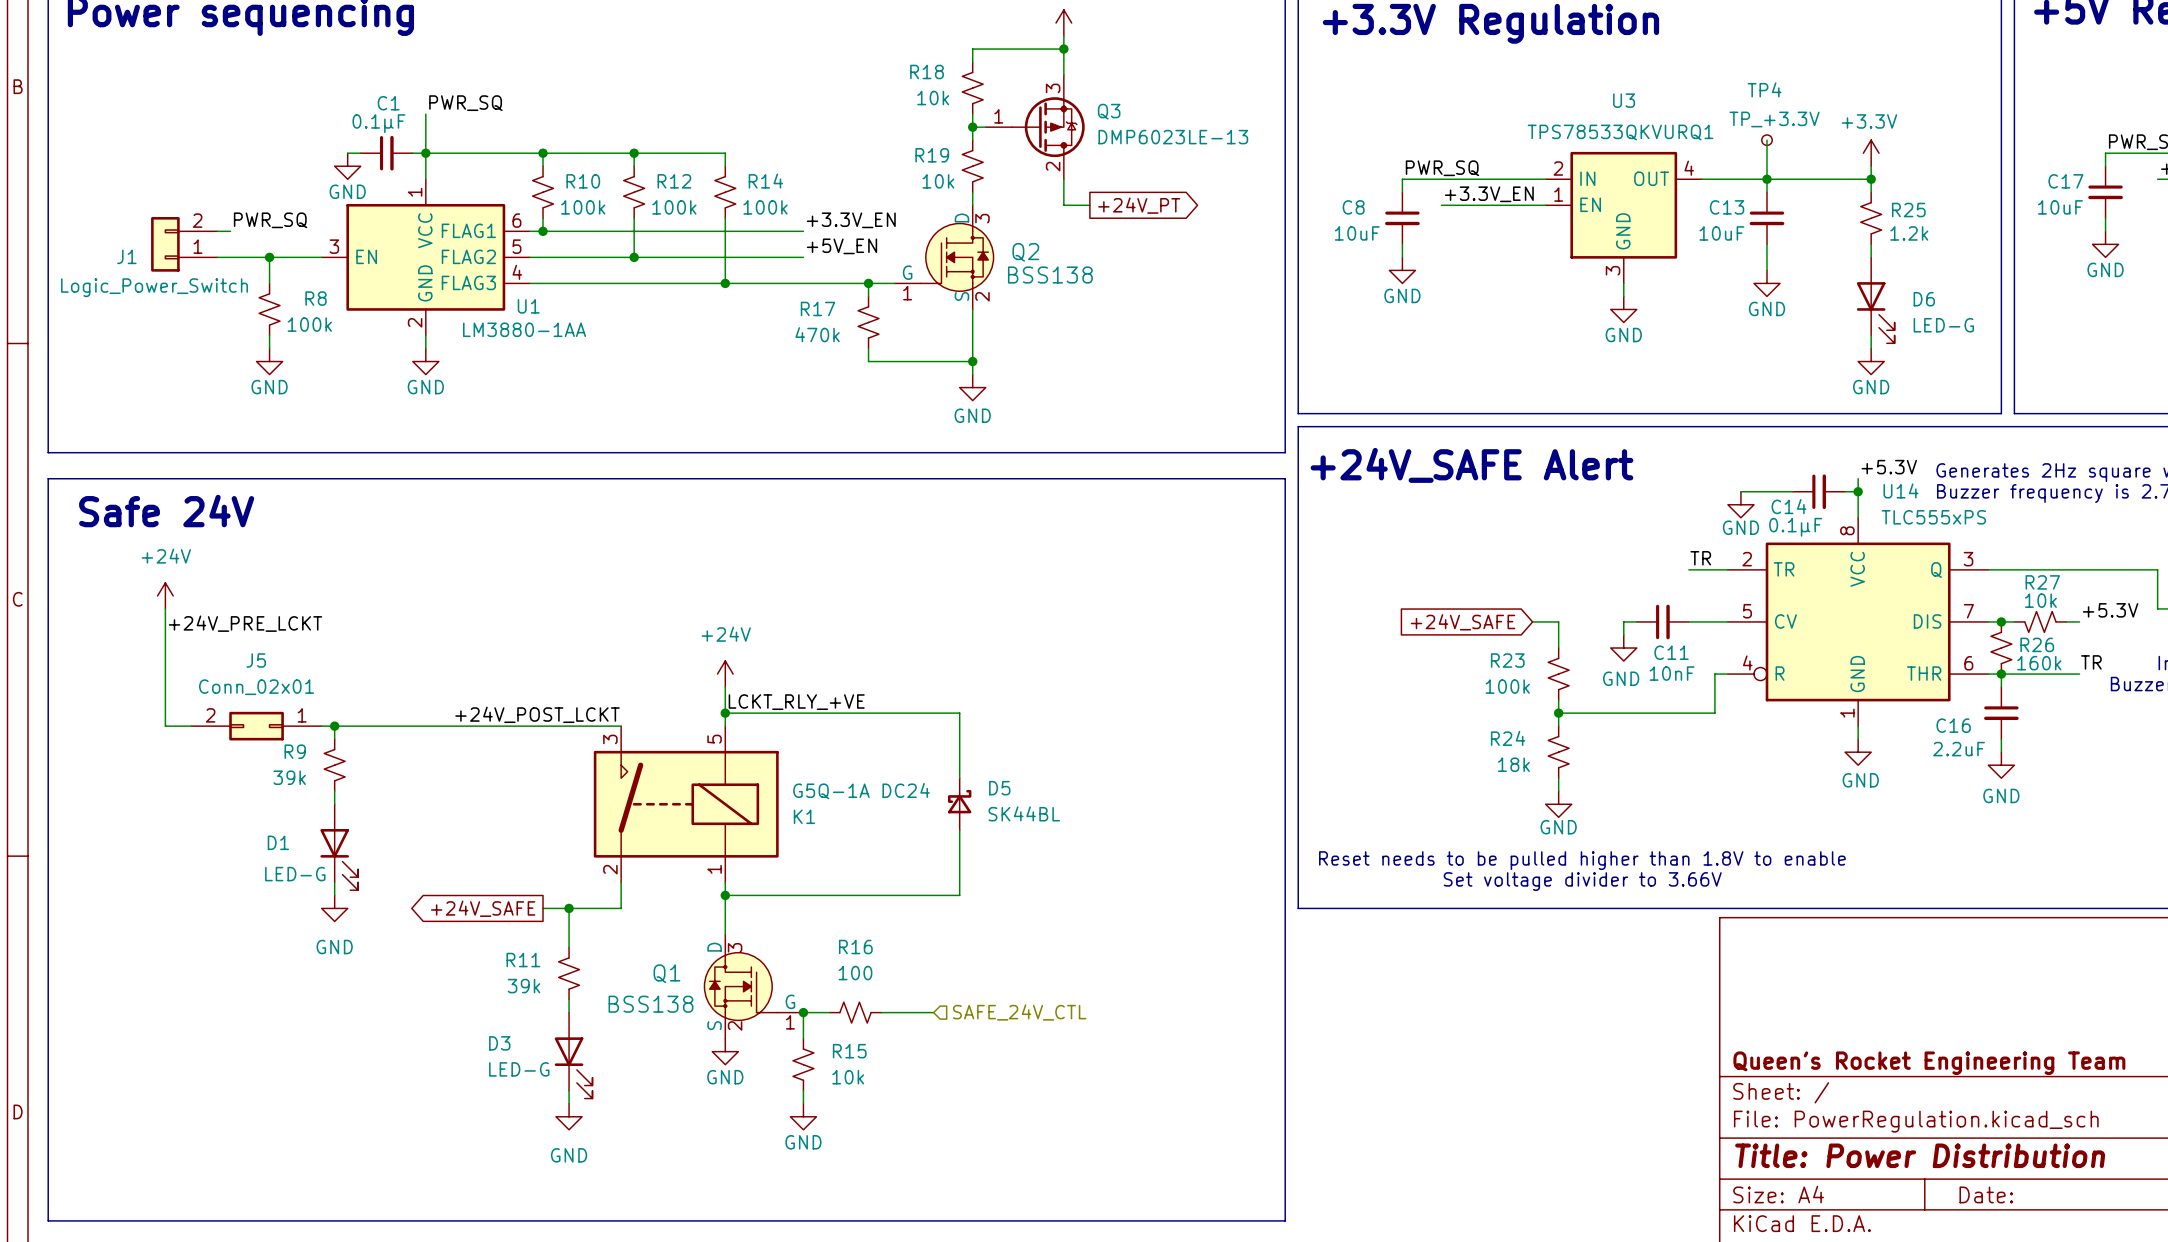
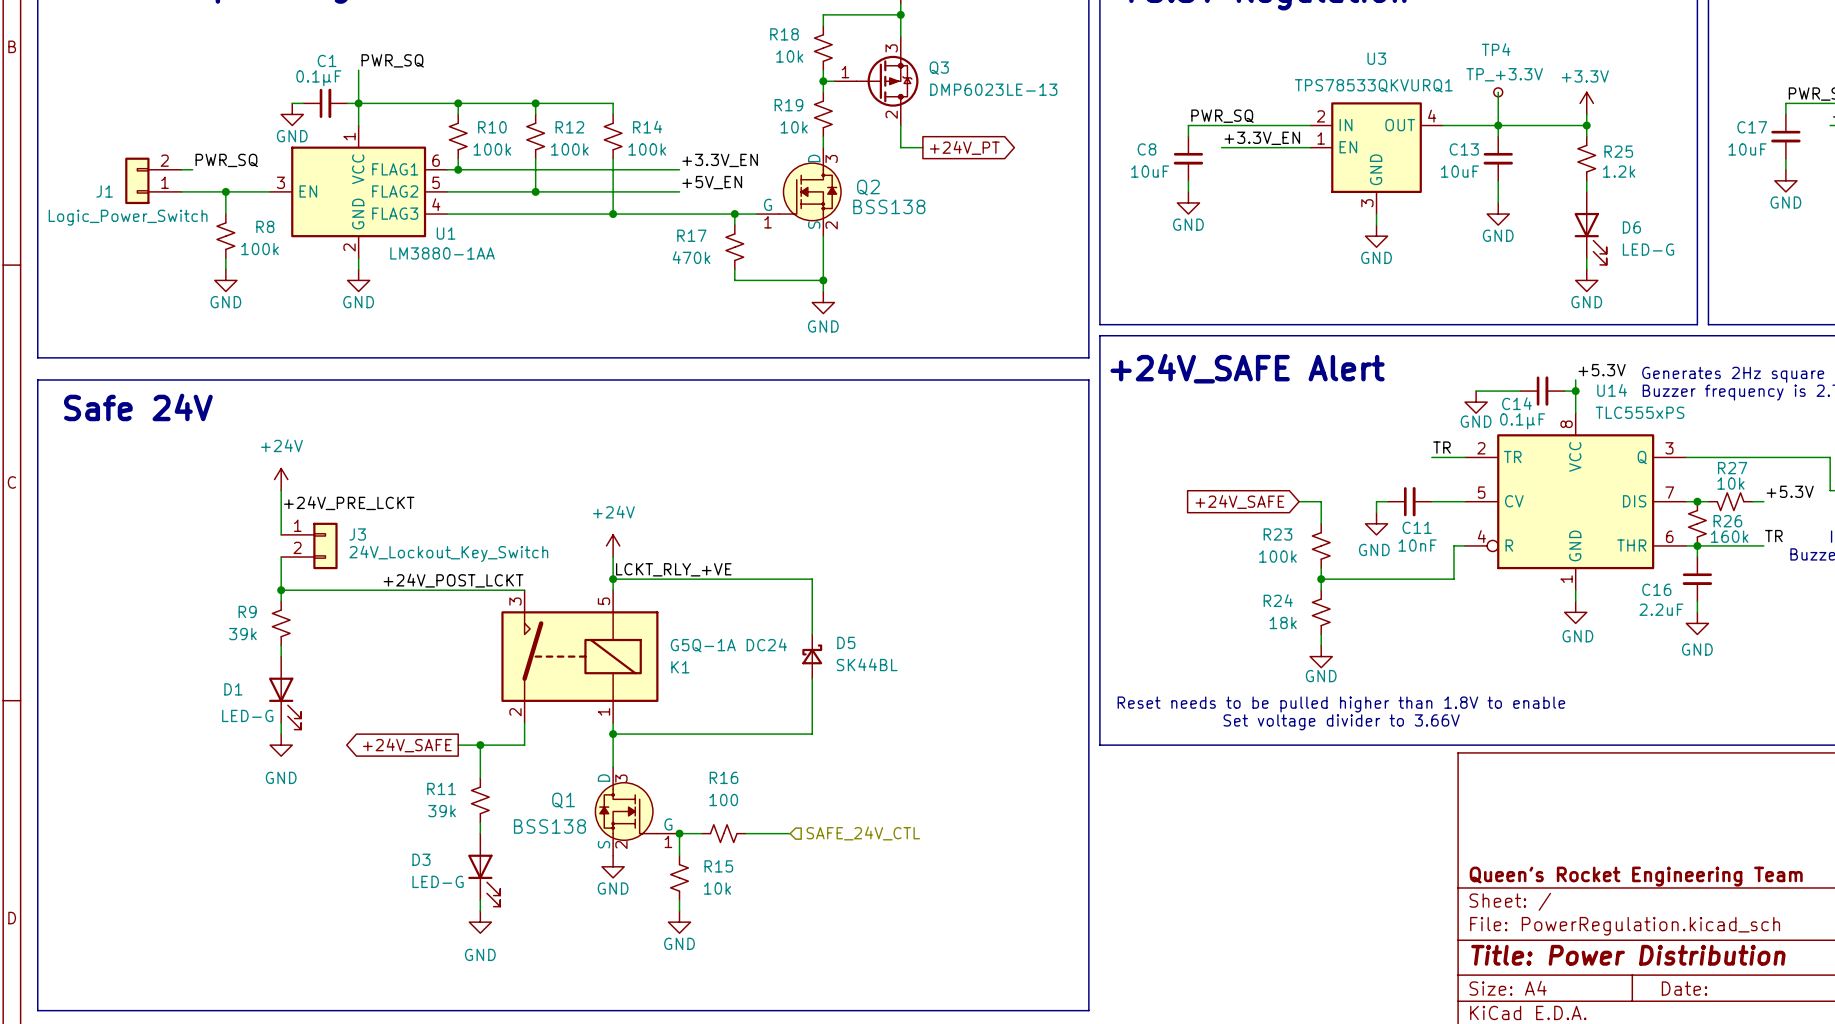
power symbol position: +24V (165, 595) -> +24V (281, 479)
wire: (165, 608) (165, 726) (191, 726) -> none
wire: none -> (281, 490) (281, 534)
label position: +24V_PRE_LCKT (245, 623) -> +24V_PRE_LCKT (349, 503)
J3: none -> 24V_Lockout_Key_Switch (309, 545)
J5: Conn_02x01 (256, 726) -> none
wire: (321, 726) (334, 726) -> (281, 557) (281, 590)

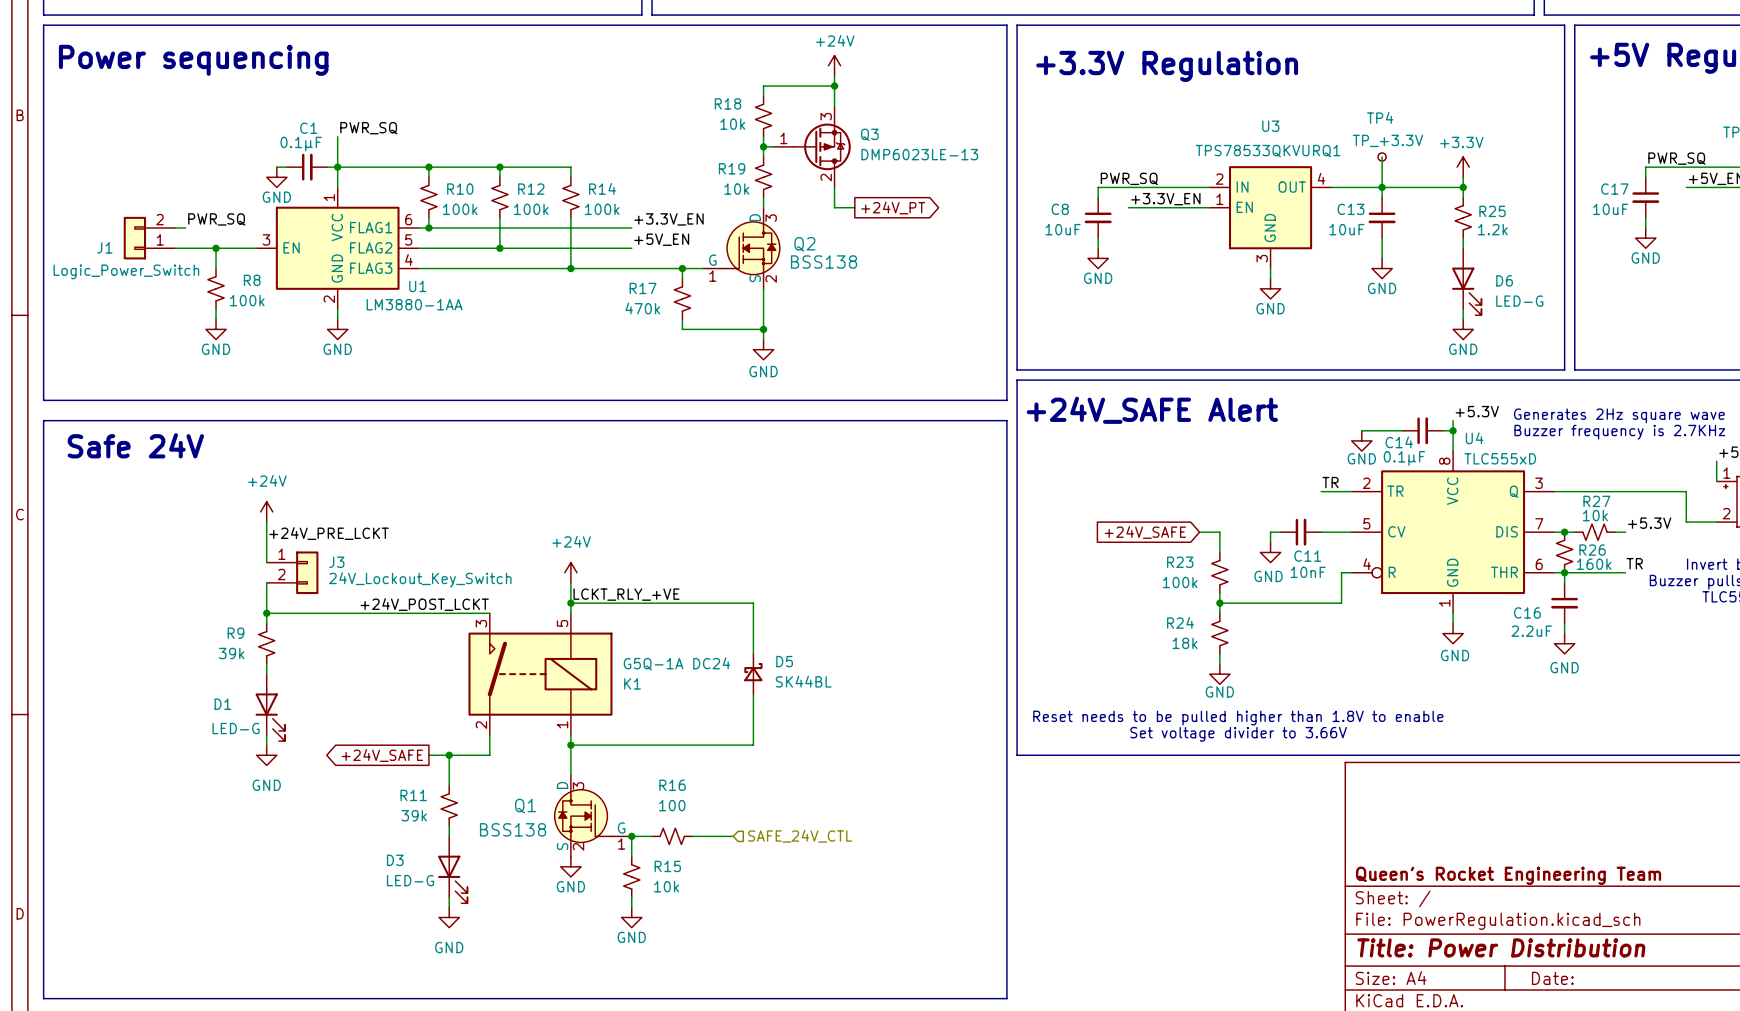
U14 name: U14 (1612, 390) -> U4 (1474, 438)
U14 value: TLC555xPS (1640, 412) -> TLC555xD (1500, 458)

